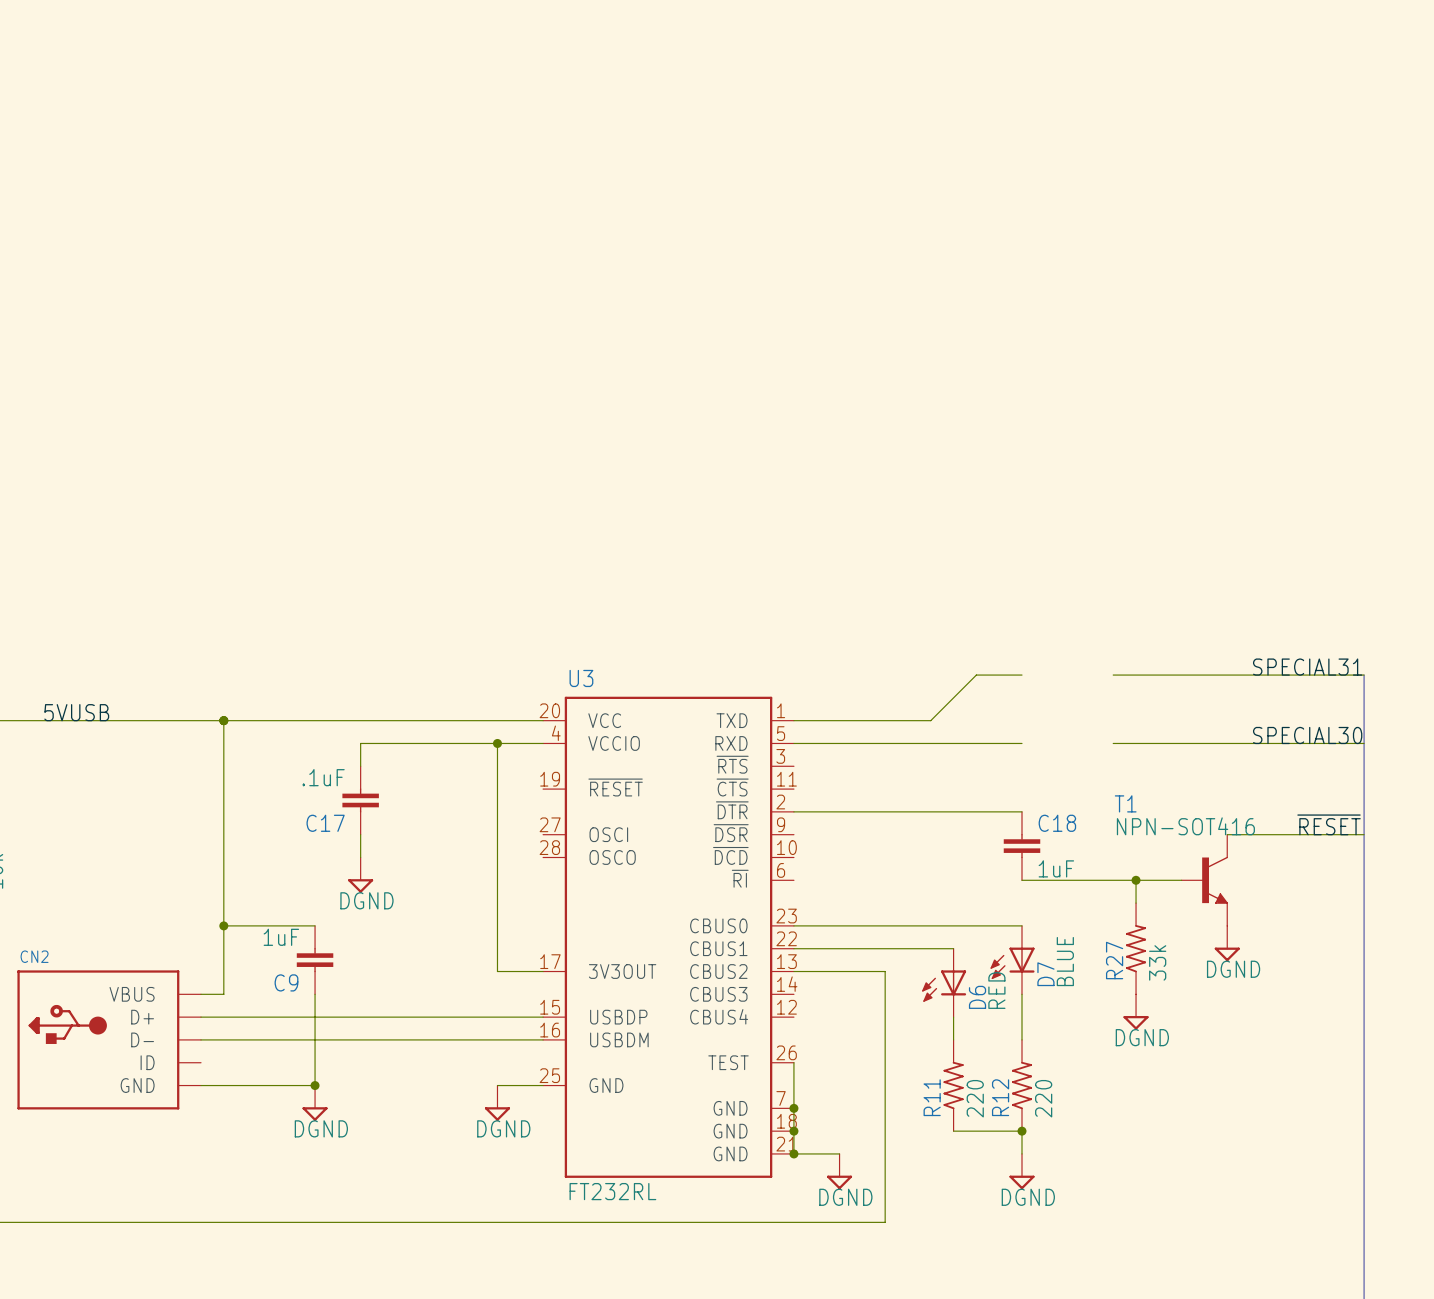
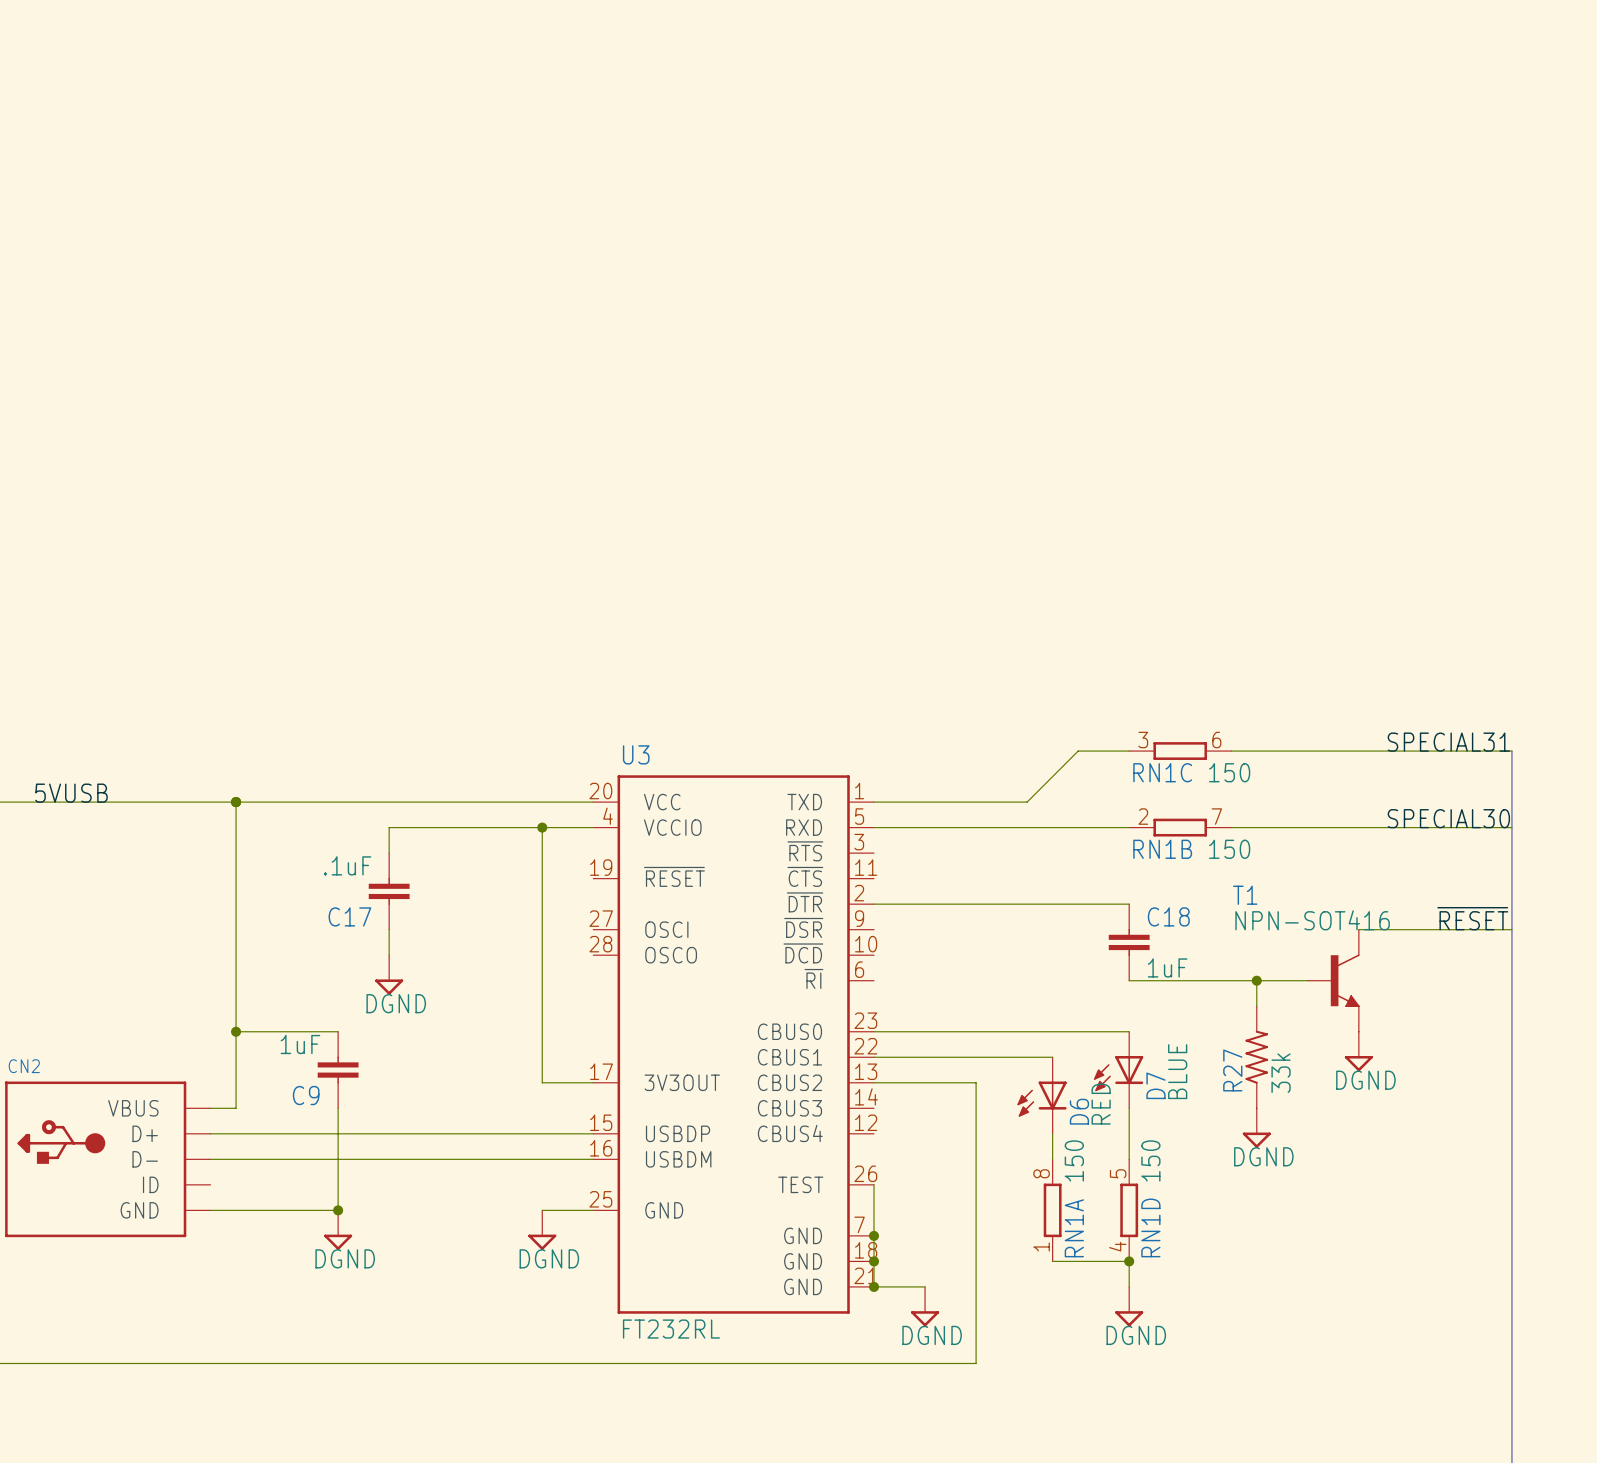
RN1C: none -> 150 (1180, 751)
RN1B: none -> 150 (1180, 827)
R11: 220 (953, 1085) -> none
RN1A: none -> 150 (1052, 1210)
R12: 220 (1022, 1085) -> none
RN1D: none -> 150 (1129, 1210)

